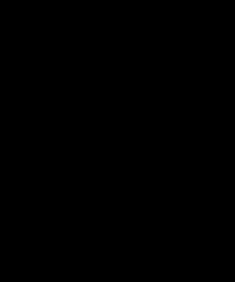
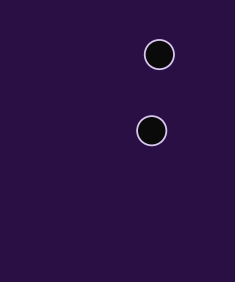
part: none -> (159, 54)
part: none -> (151, 130)

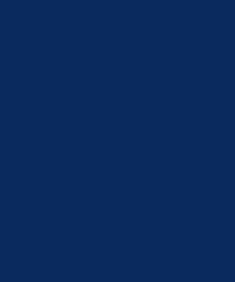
part: (159, 54) -> none
part: (151, 130) -> none

